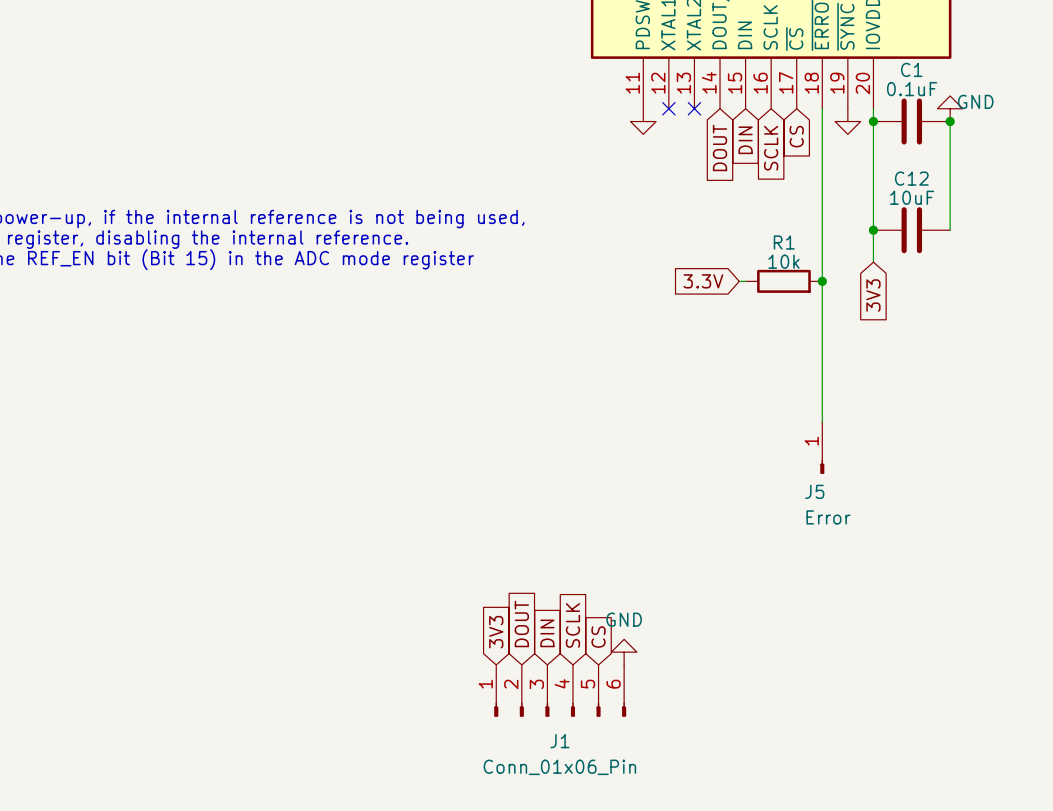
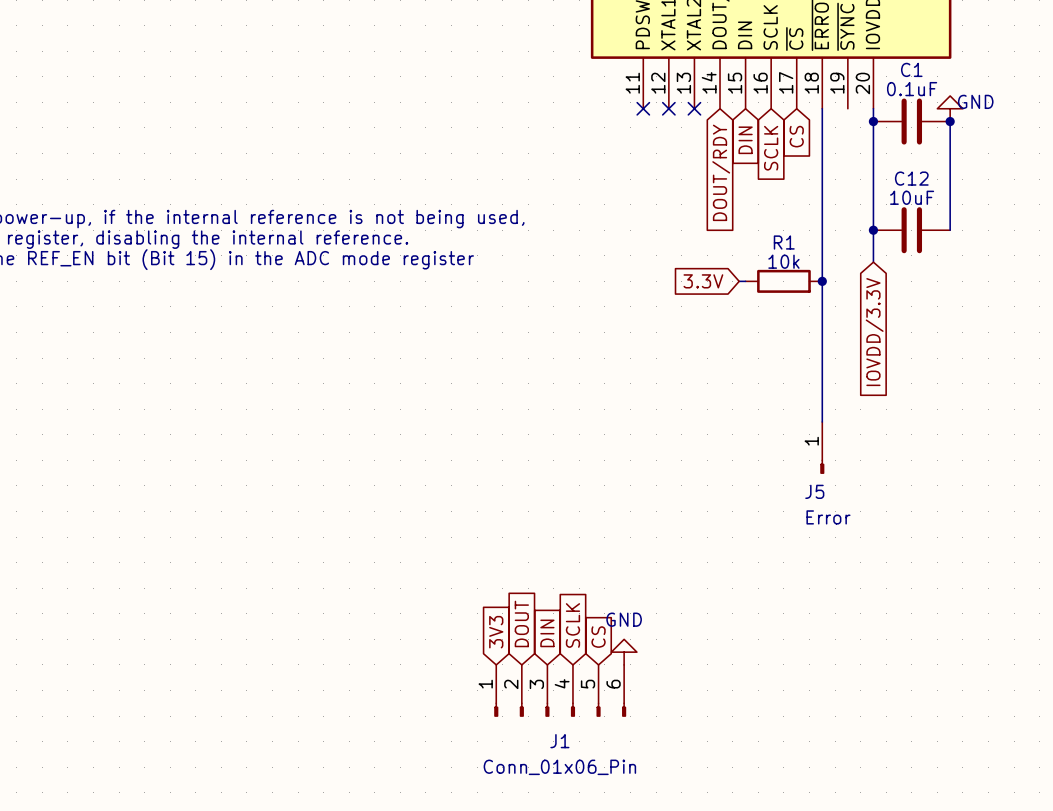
no-connect mark: none -> (643, 108)
power symbol: (643, 121) -> none
power symbol: (847, 121) -> none
global label: DOUT (720, 147) -> DOUT/RDY (721, 172)
global label: 3V3 (873, 295) -> IOVDD/3.3V (874, 332)

